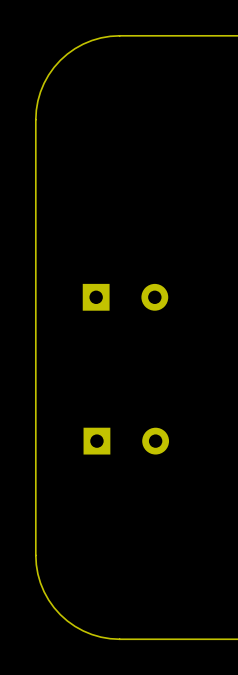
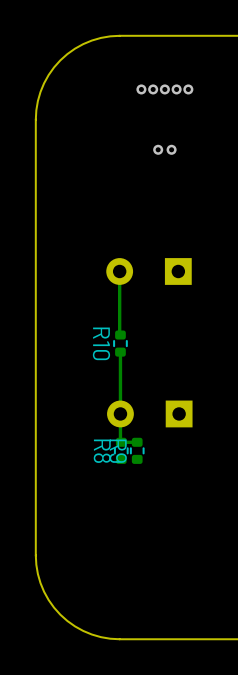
via: none -> (141, 89)
via: none -> (153, 89)
via: none -> (164, 89)
via: none -> (176, 89)
via: none -> (188, 89)
via: none -> (158, 149)
via: none -> (171, 149)
track: none -> (119, 271) (120, 335)
part rotation: 0° (125, 297) -> 180° (149, 271)
R10: none -> (120, 343)
track: none -> (120, 352) (120, 441) (137, 442)
part rotation: 0° (126, 441) -> 180° (149, 413)
R8: none -> (121, 450)
R9: none -> (137, 450)

